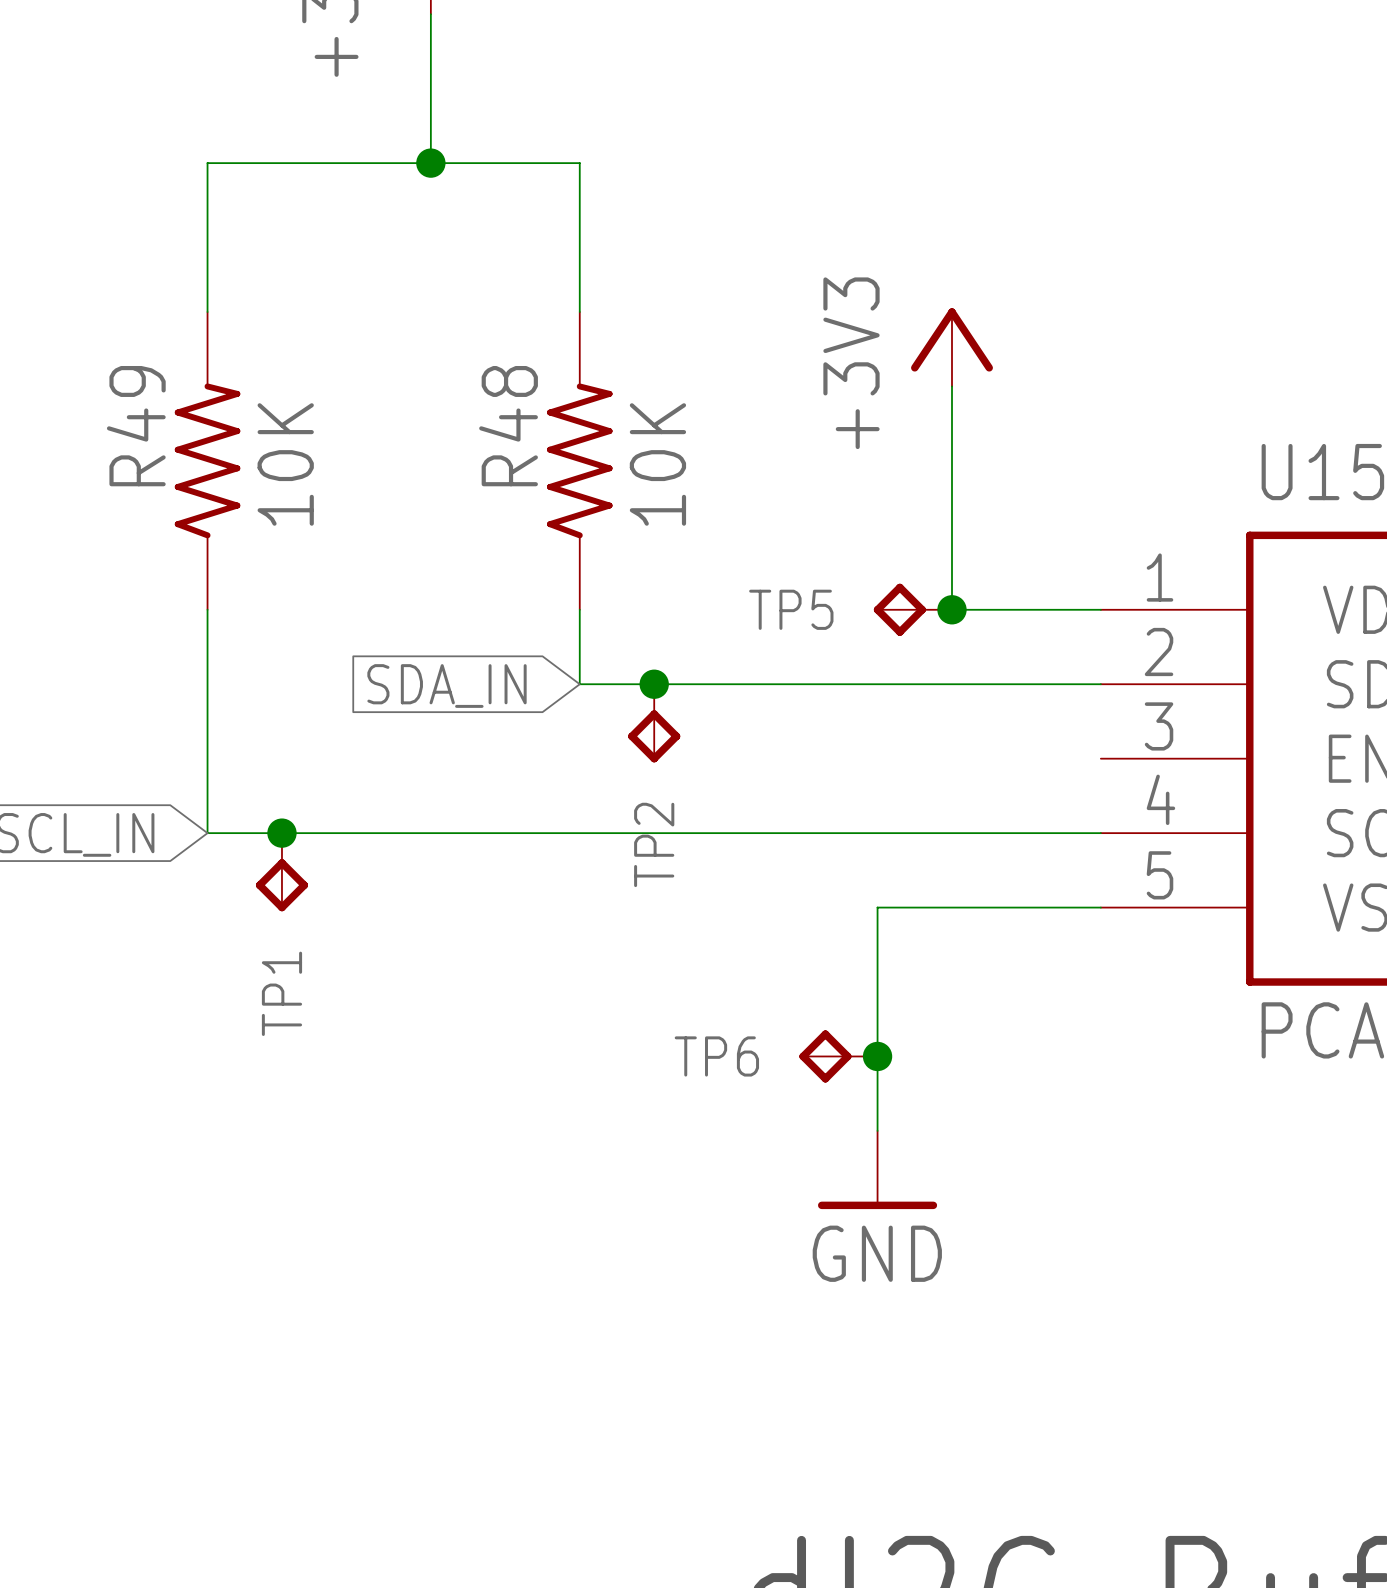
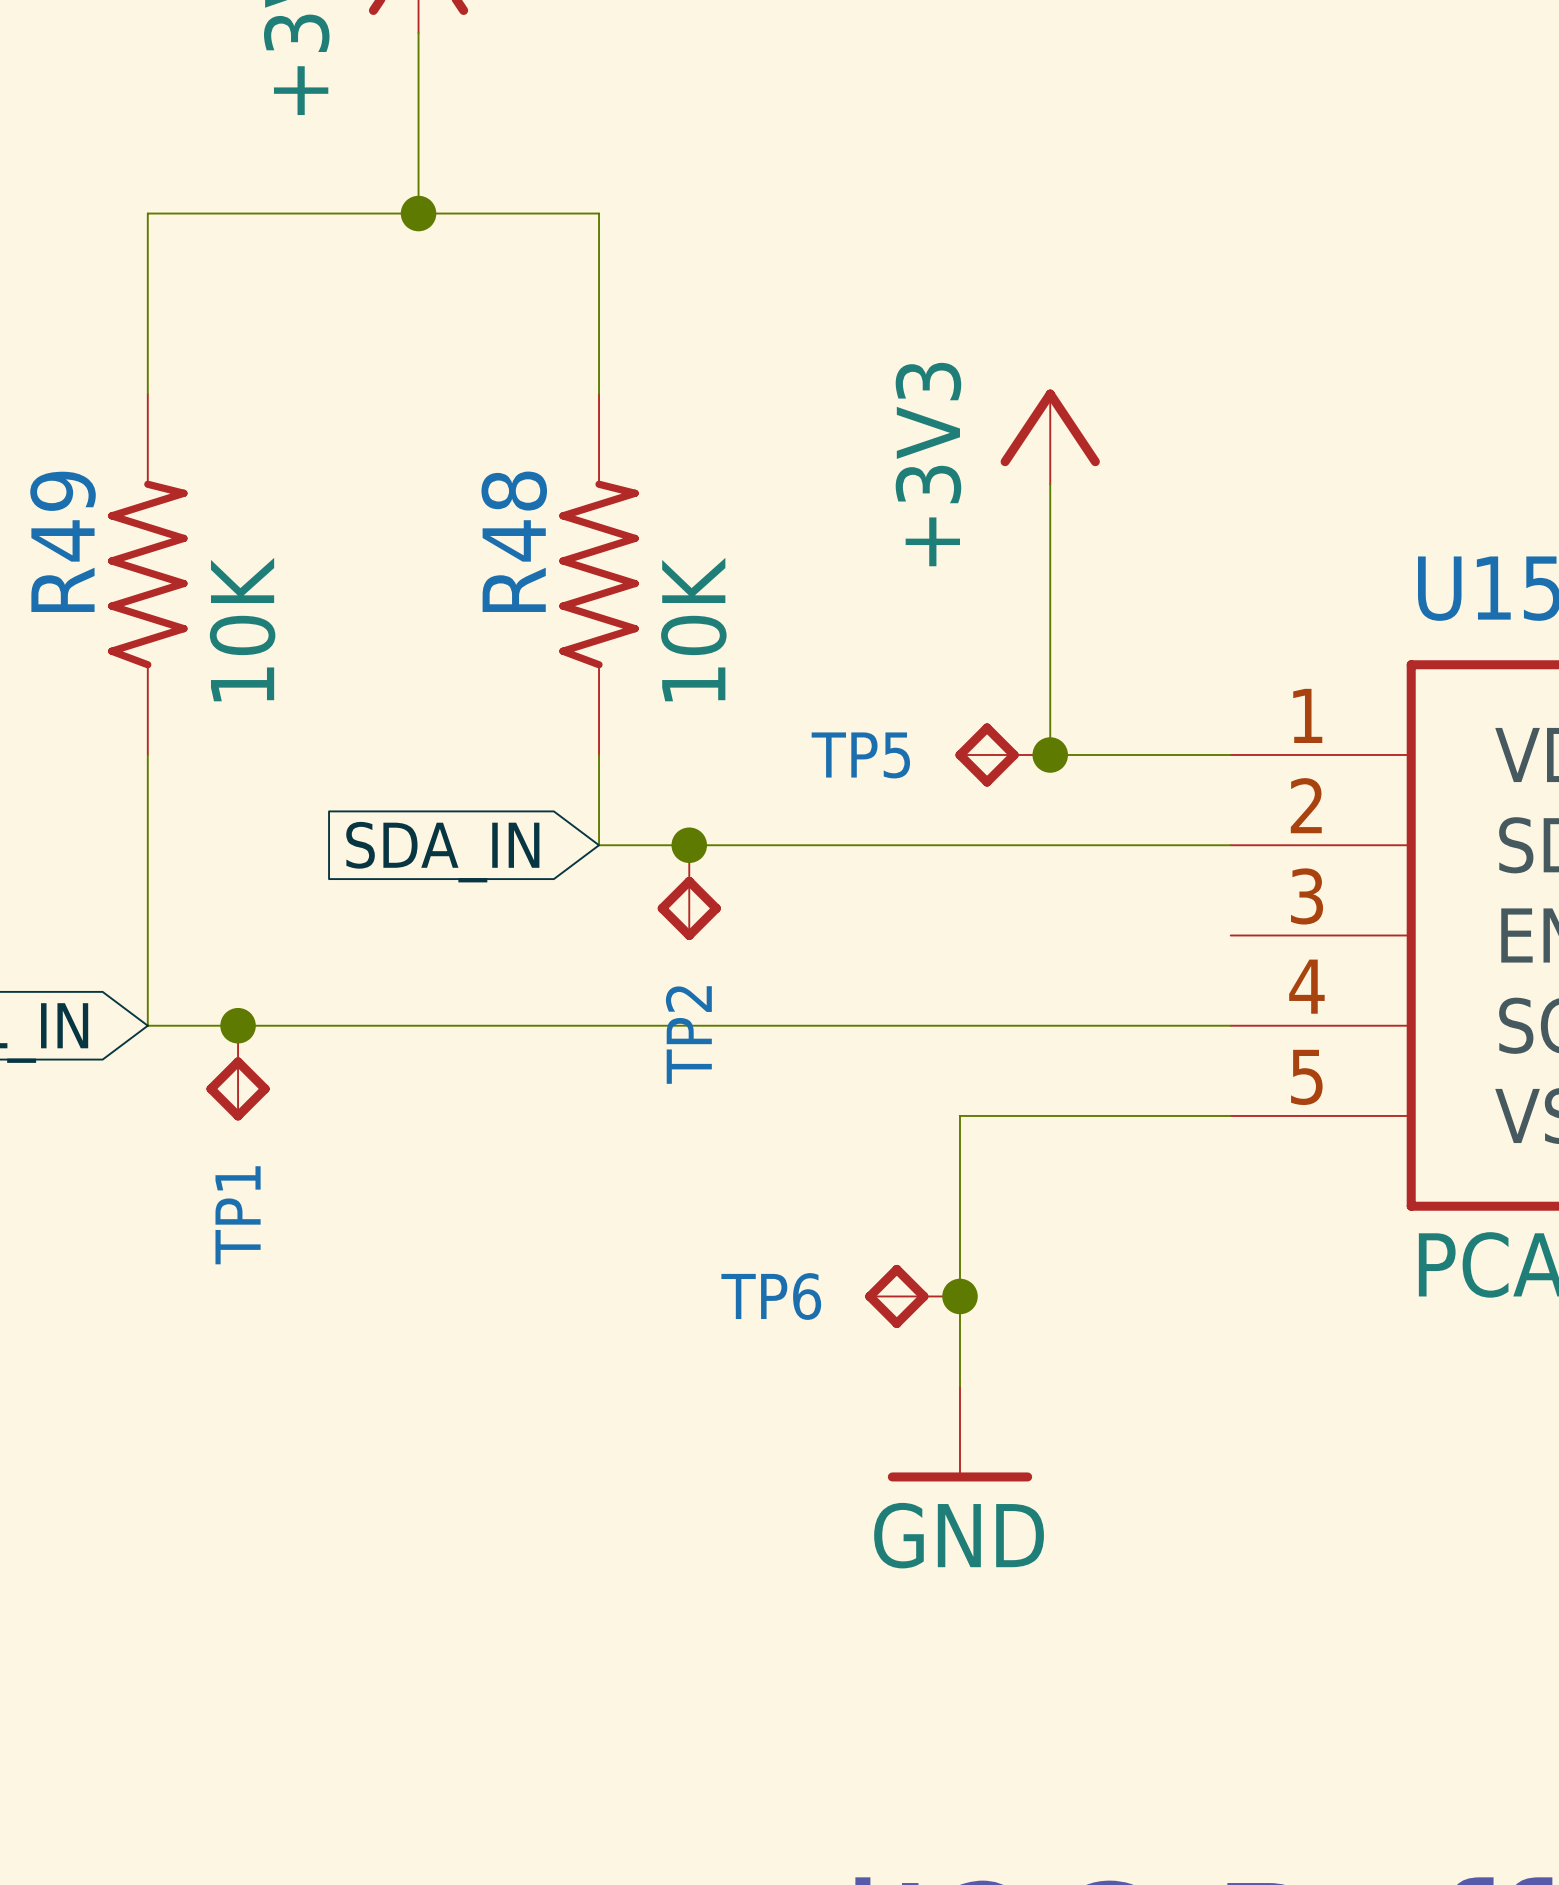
R49 value position: 10K (285, 464) -> 10K (242, 629)
R48 value position: 10K (657, 464) -> 10K (693, 629)

